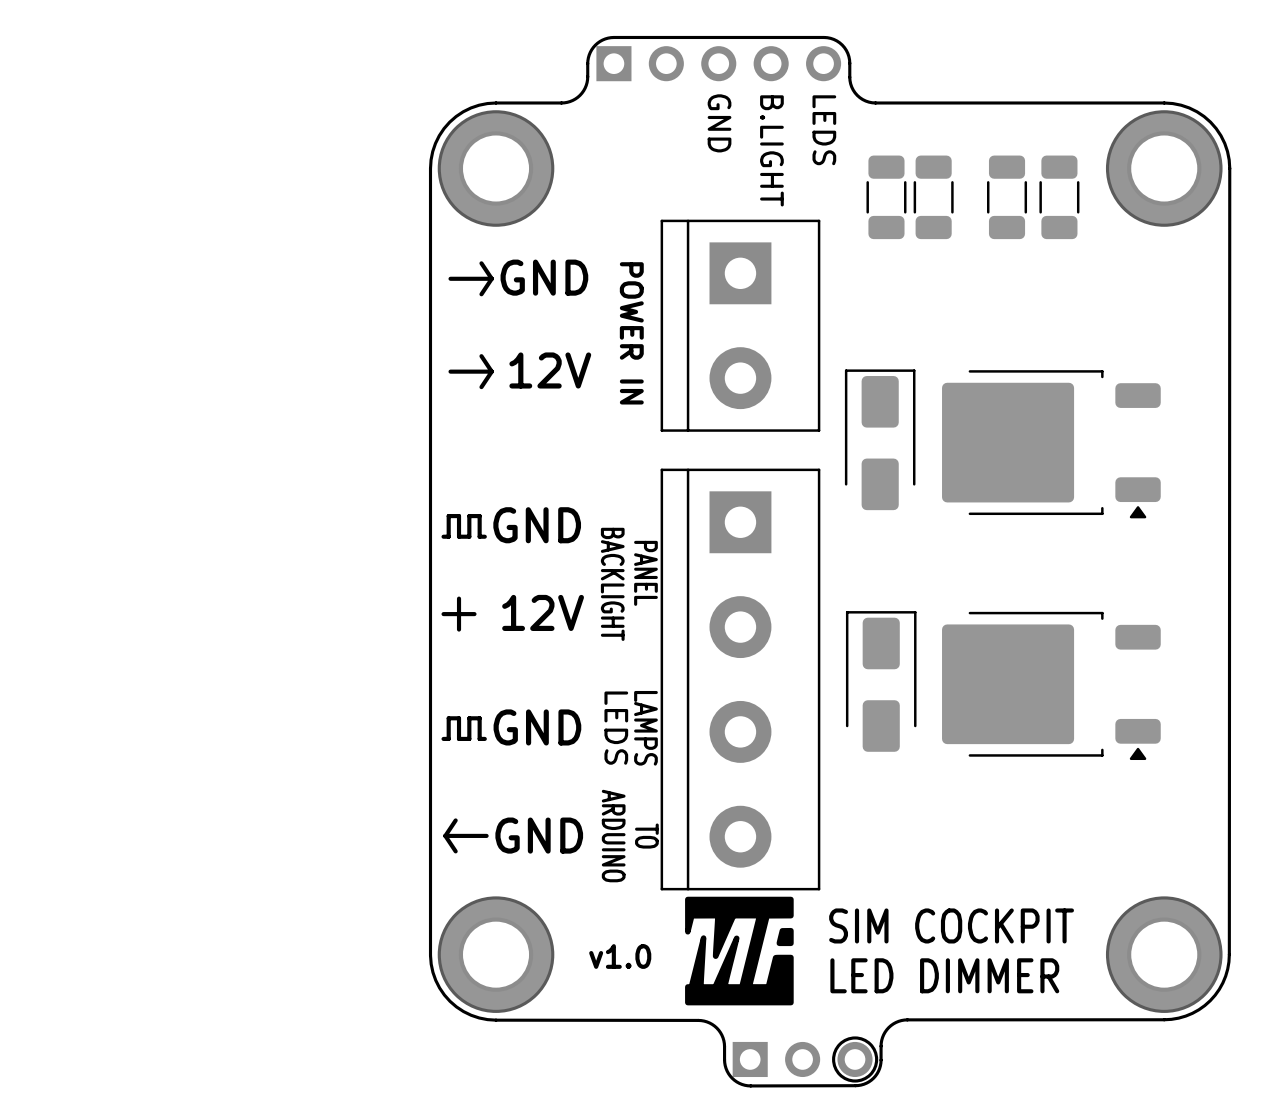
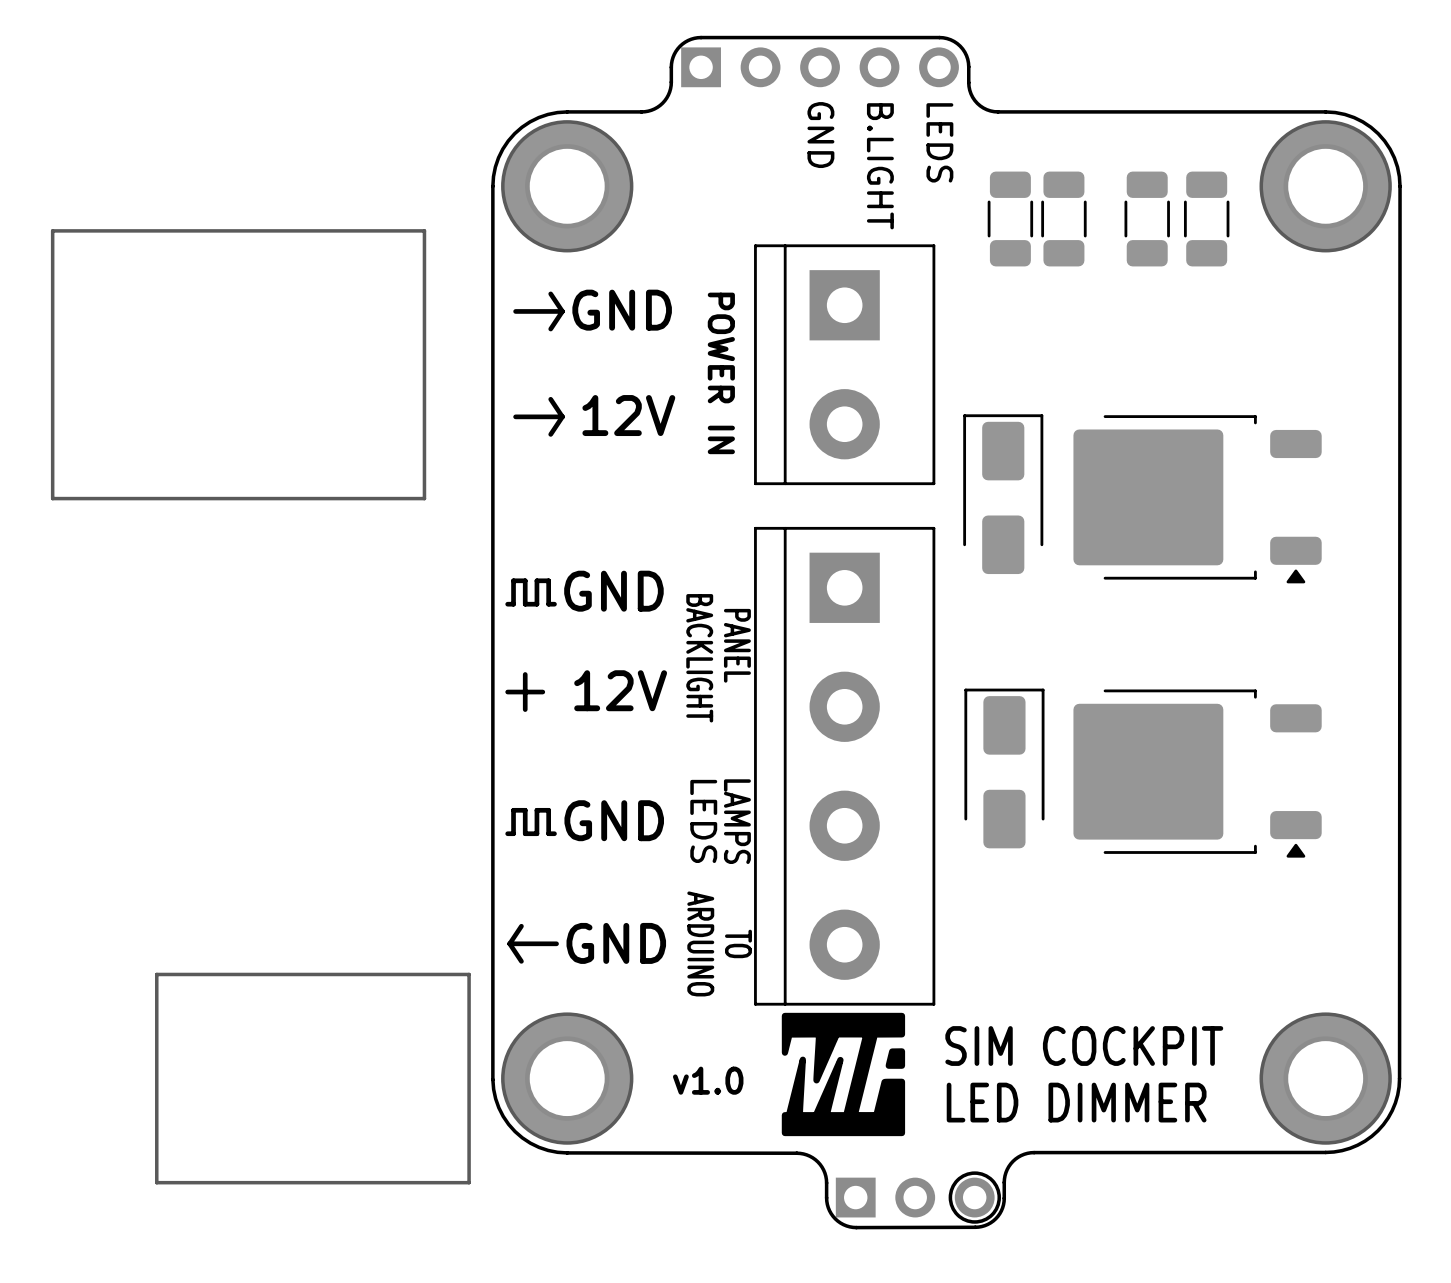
line: none -> (52, 230) (52, 498) (424, 498) (424, 230) (52, 230)
line: none -> (156, 974) (156, 1182) (469, 1182) (469, 974) (156, 974)

